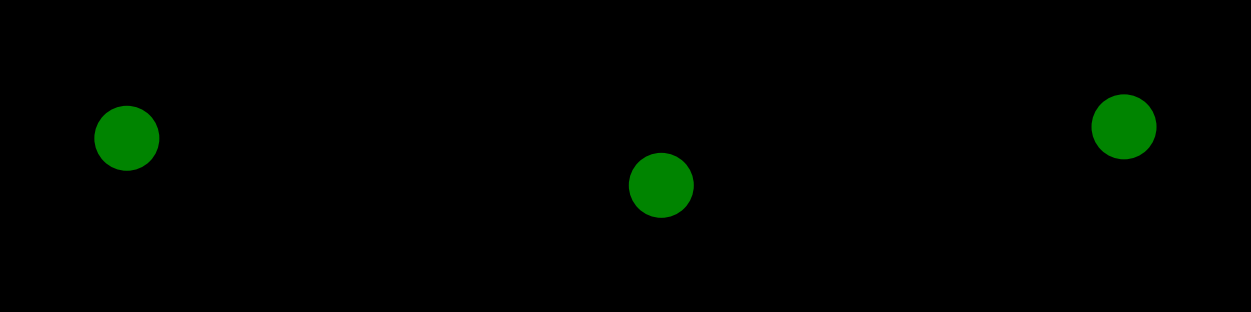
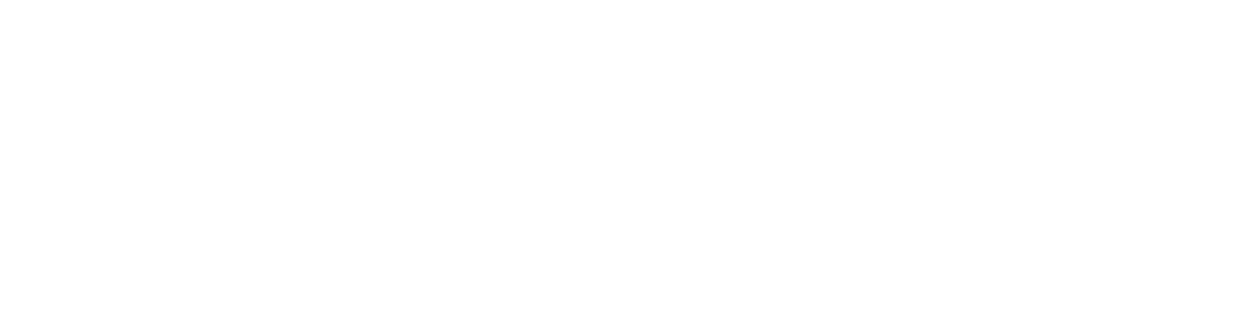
part: (1124, 126) -> none
part: (126, 138) -> none
part: (661, 185) -> none

